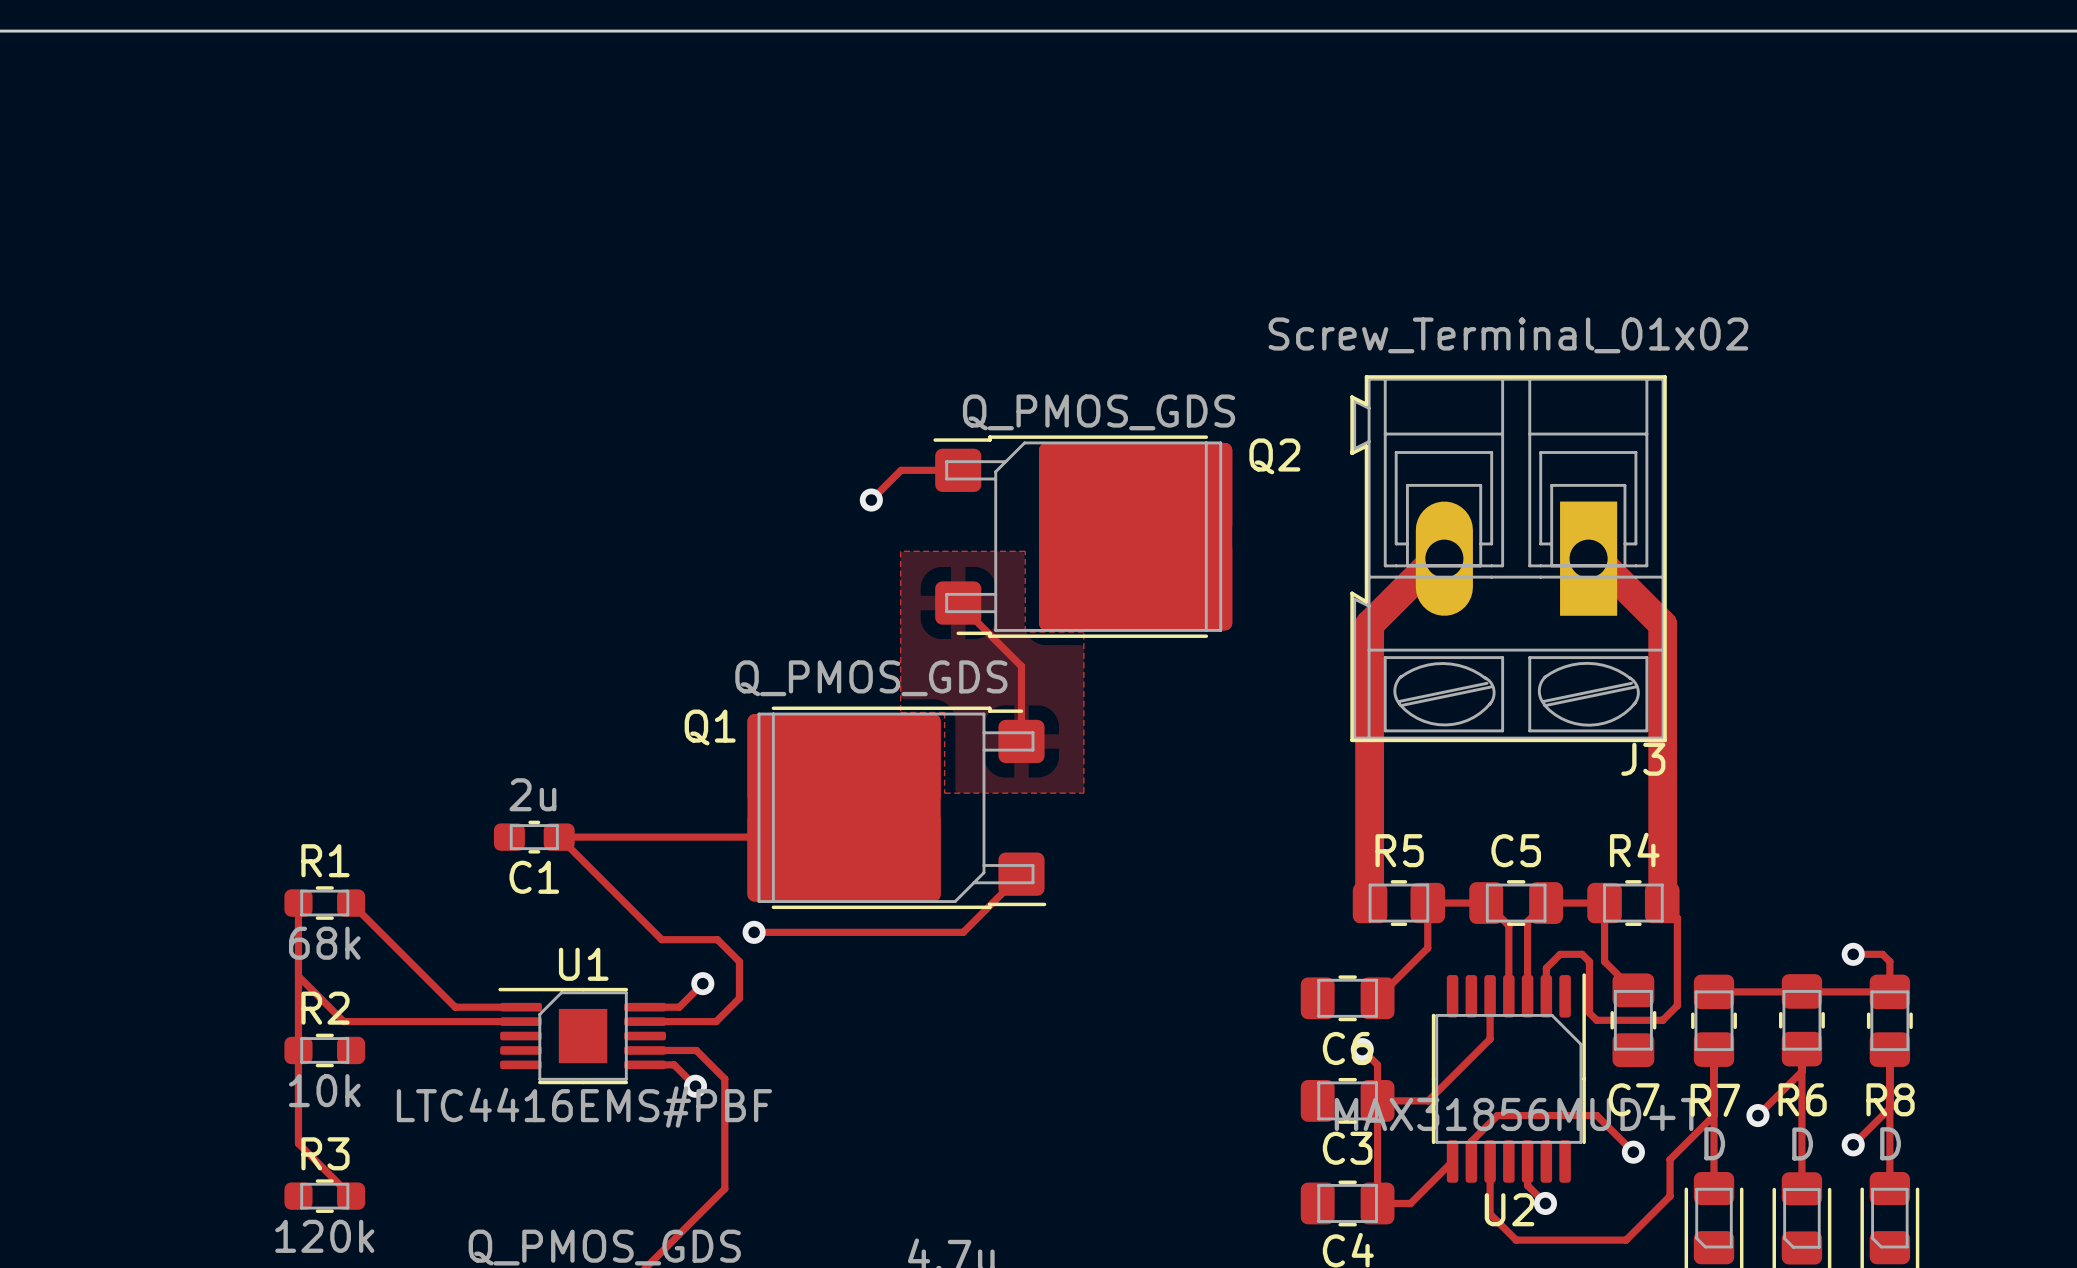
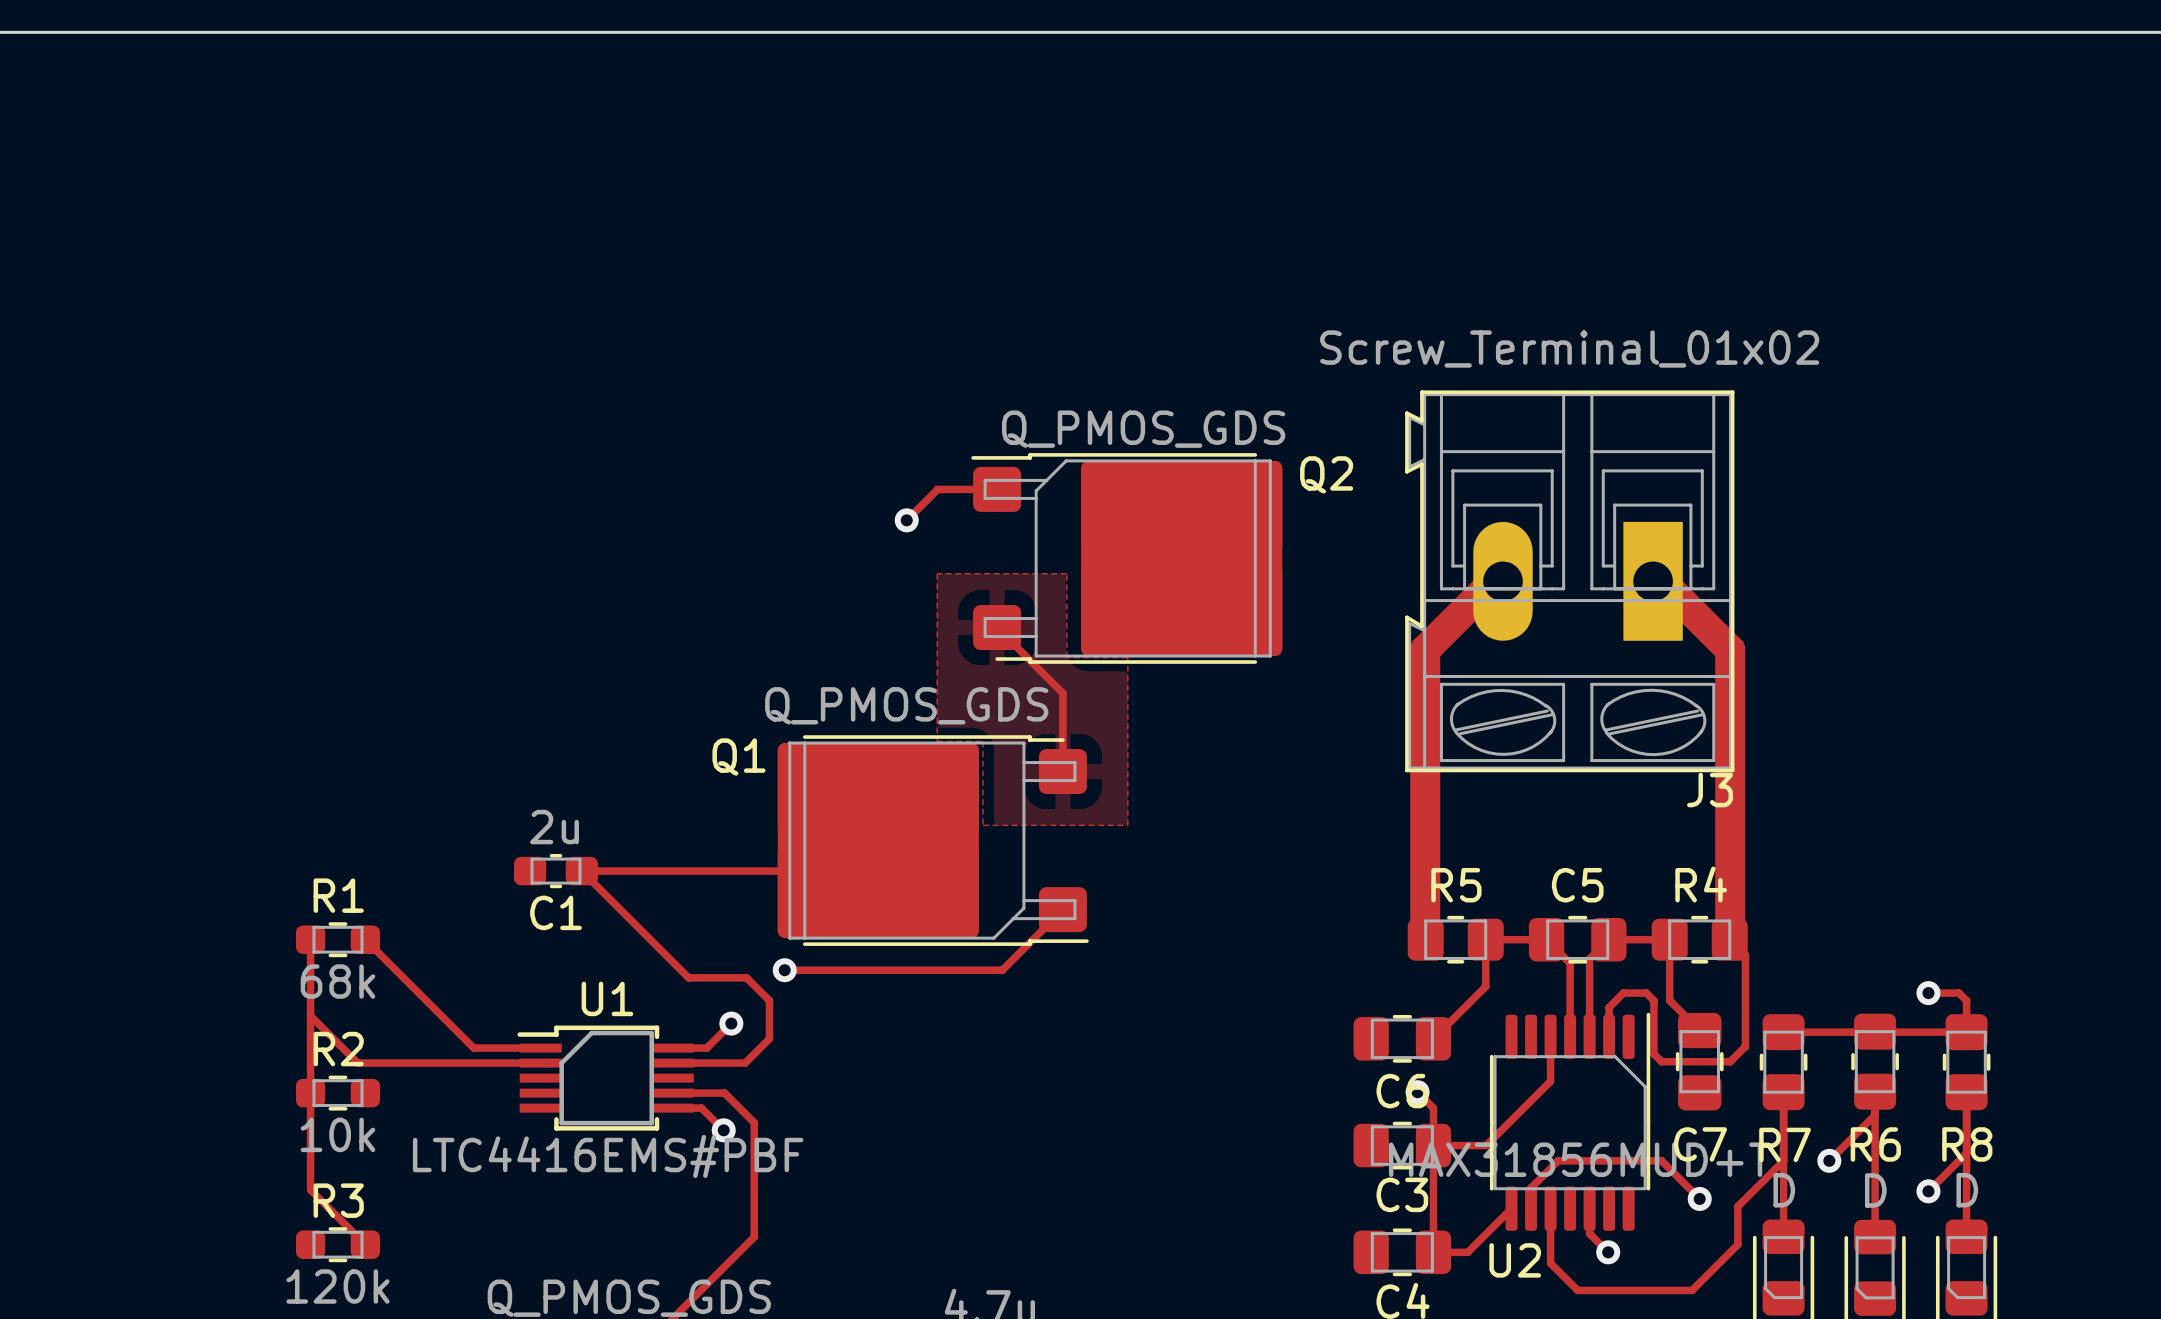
U1 footprint: [498, 987, 666, 1085] -> [517, 1025, 694, 1131]
U2 name position: U2 (1509, 1209) -> U2 (1515, 1260)

